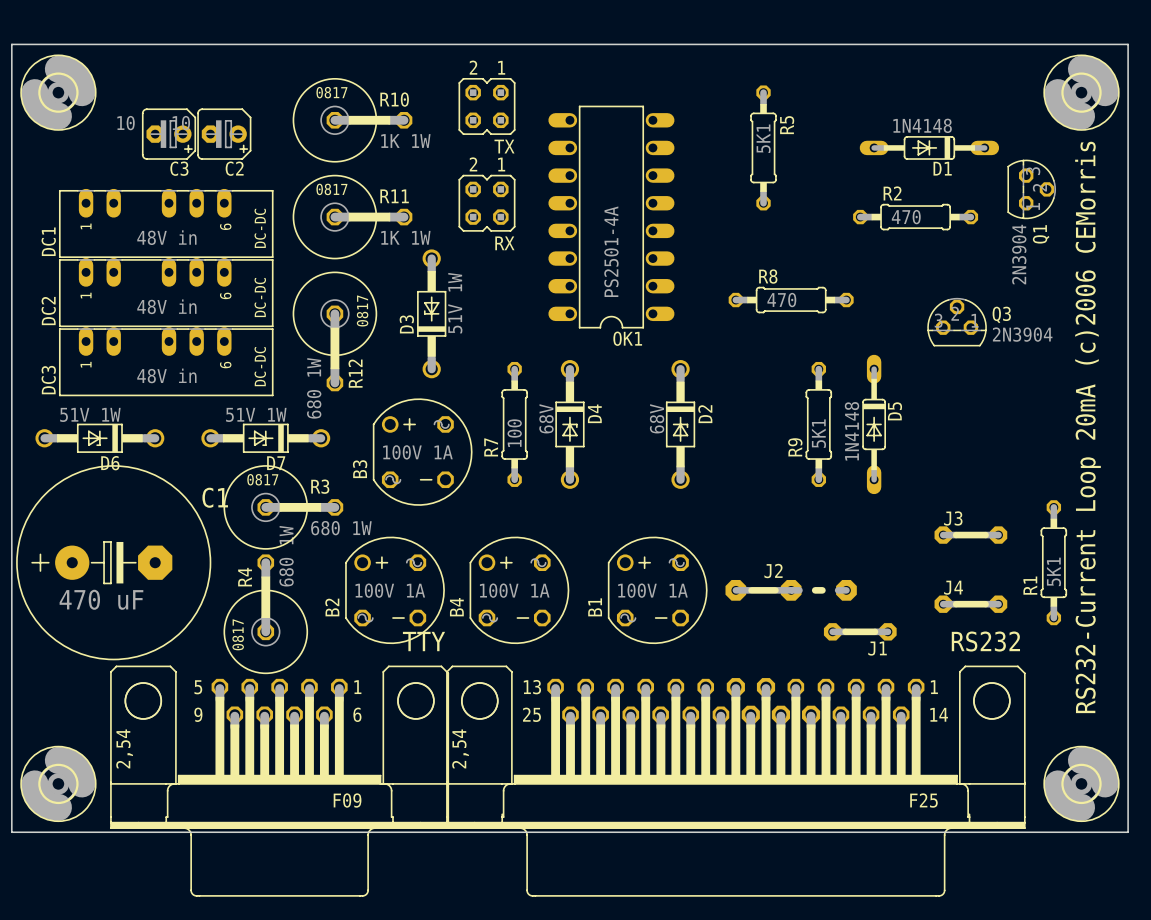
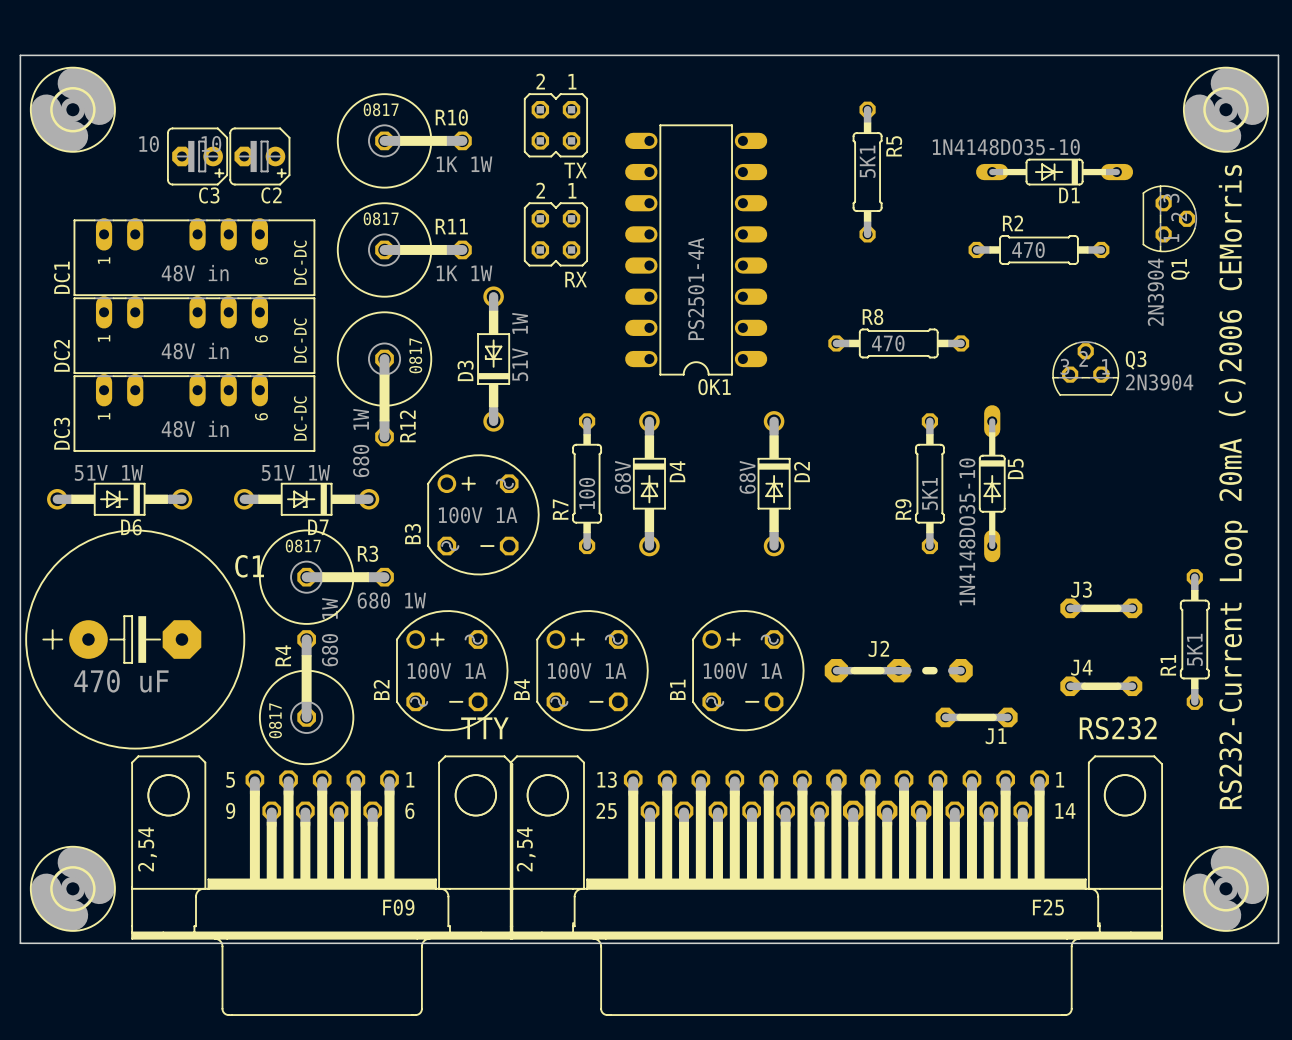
D1 value: 1N4148 (922, 125) -> 1N4148DO35-10 (1006, 147)
D5 value: 1N4148 (852, 431) -> 1N4148DO35-10 (967, 531)

